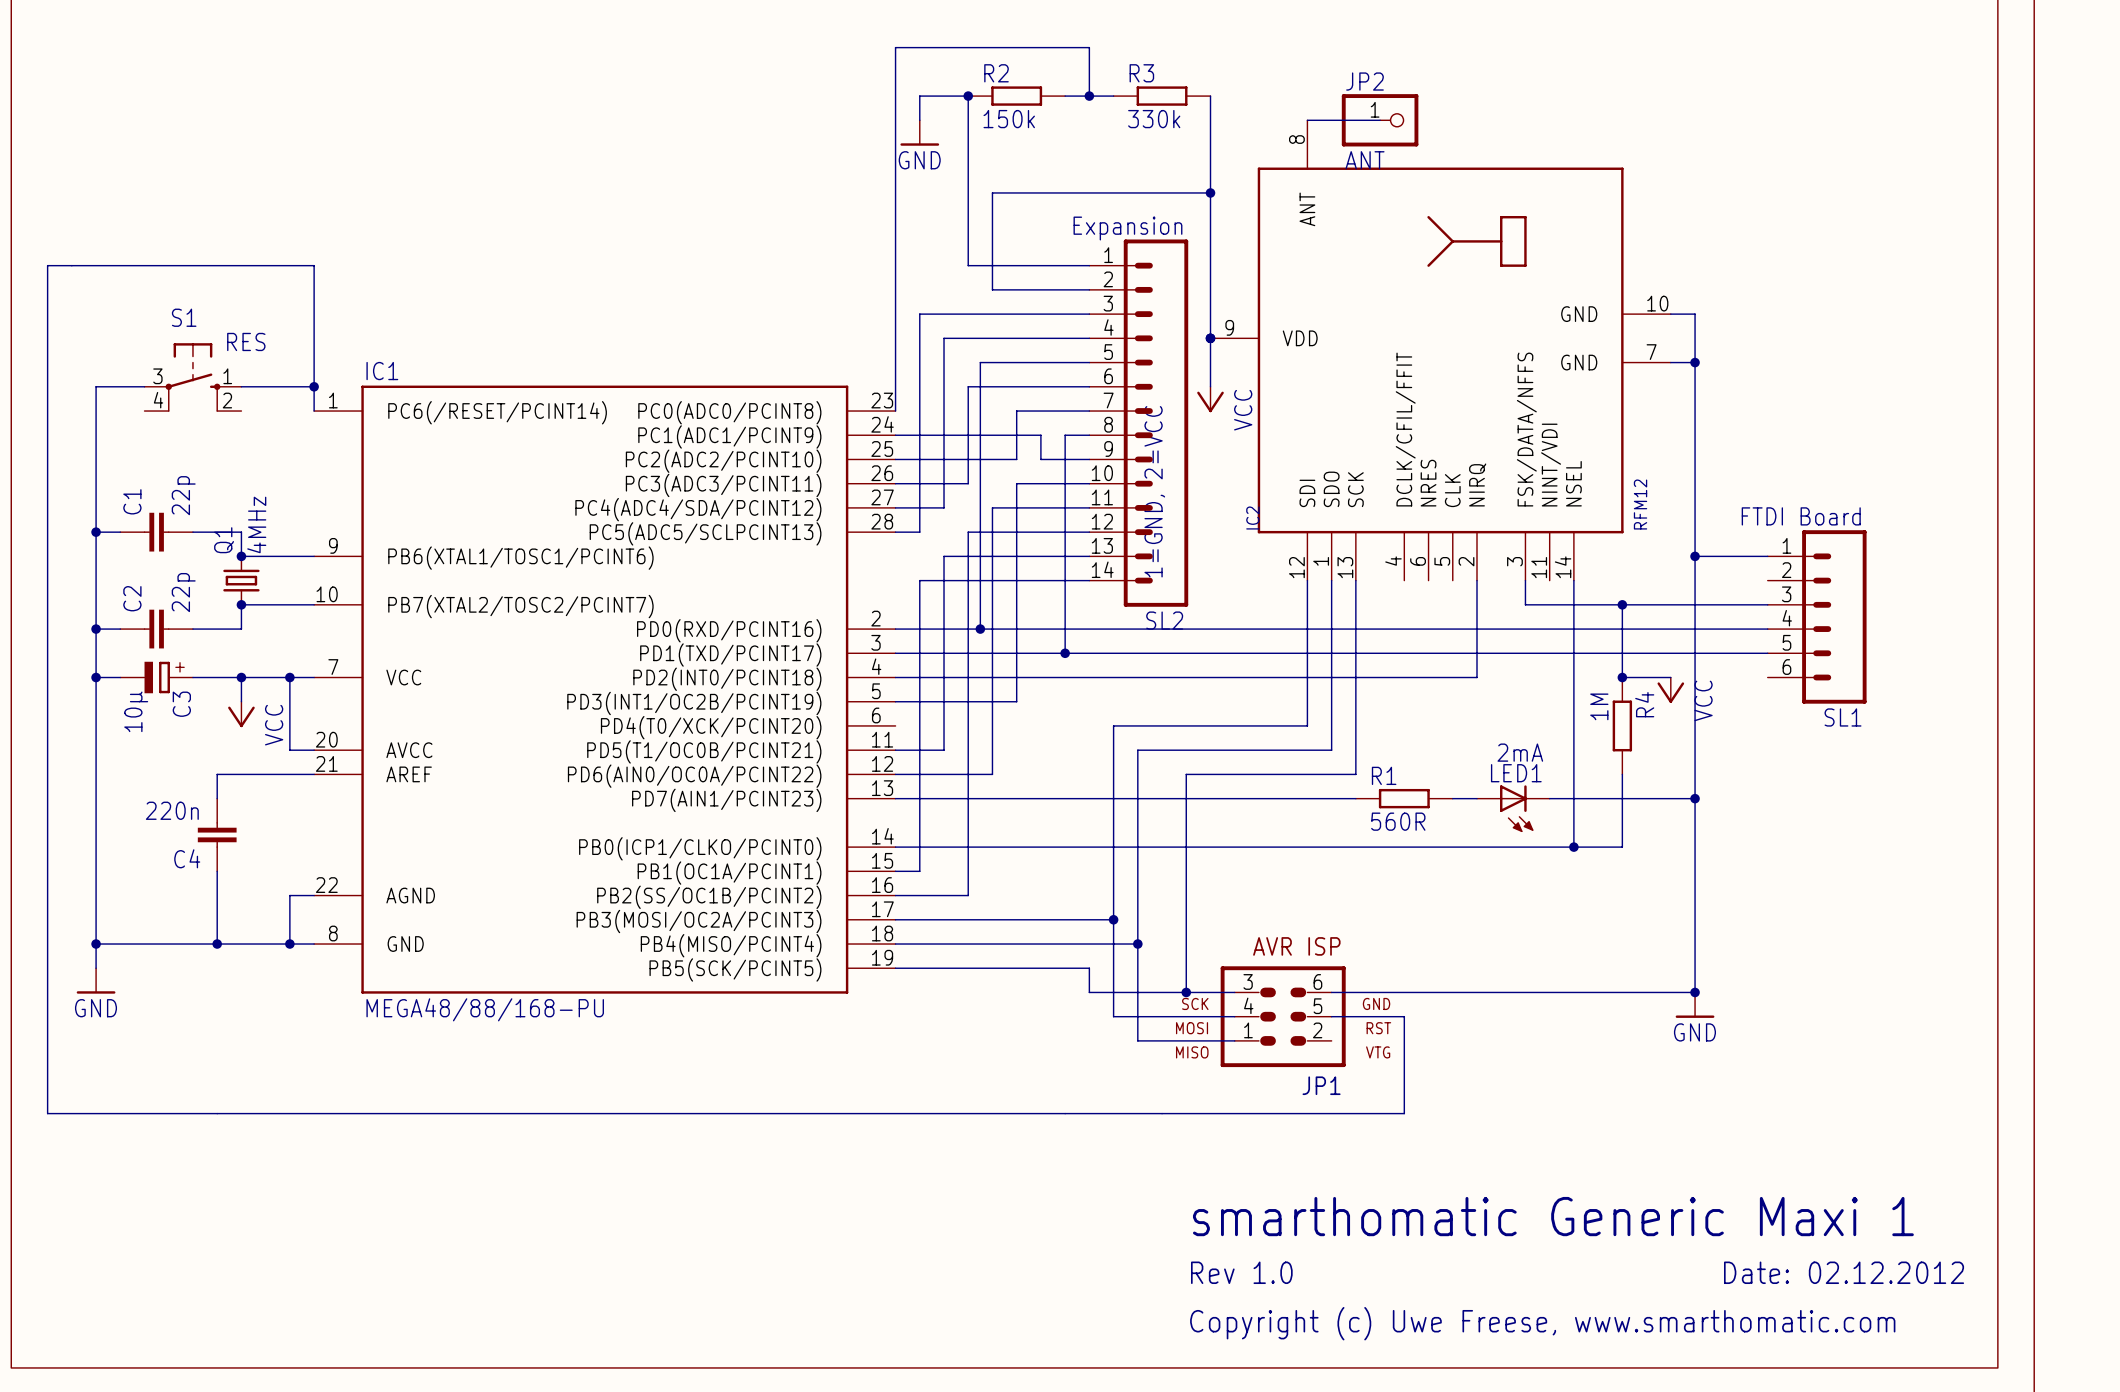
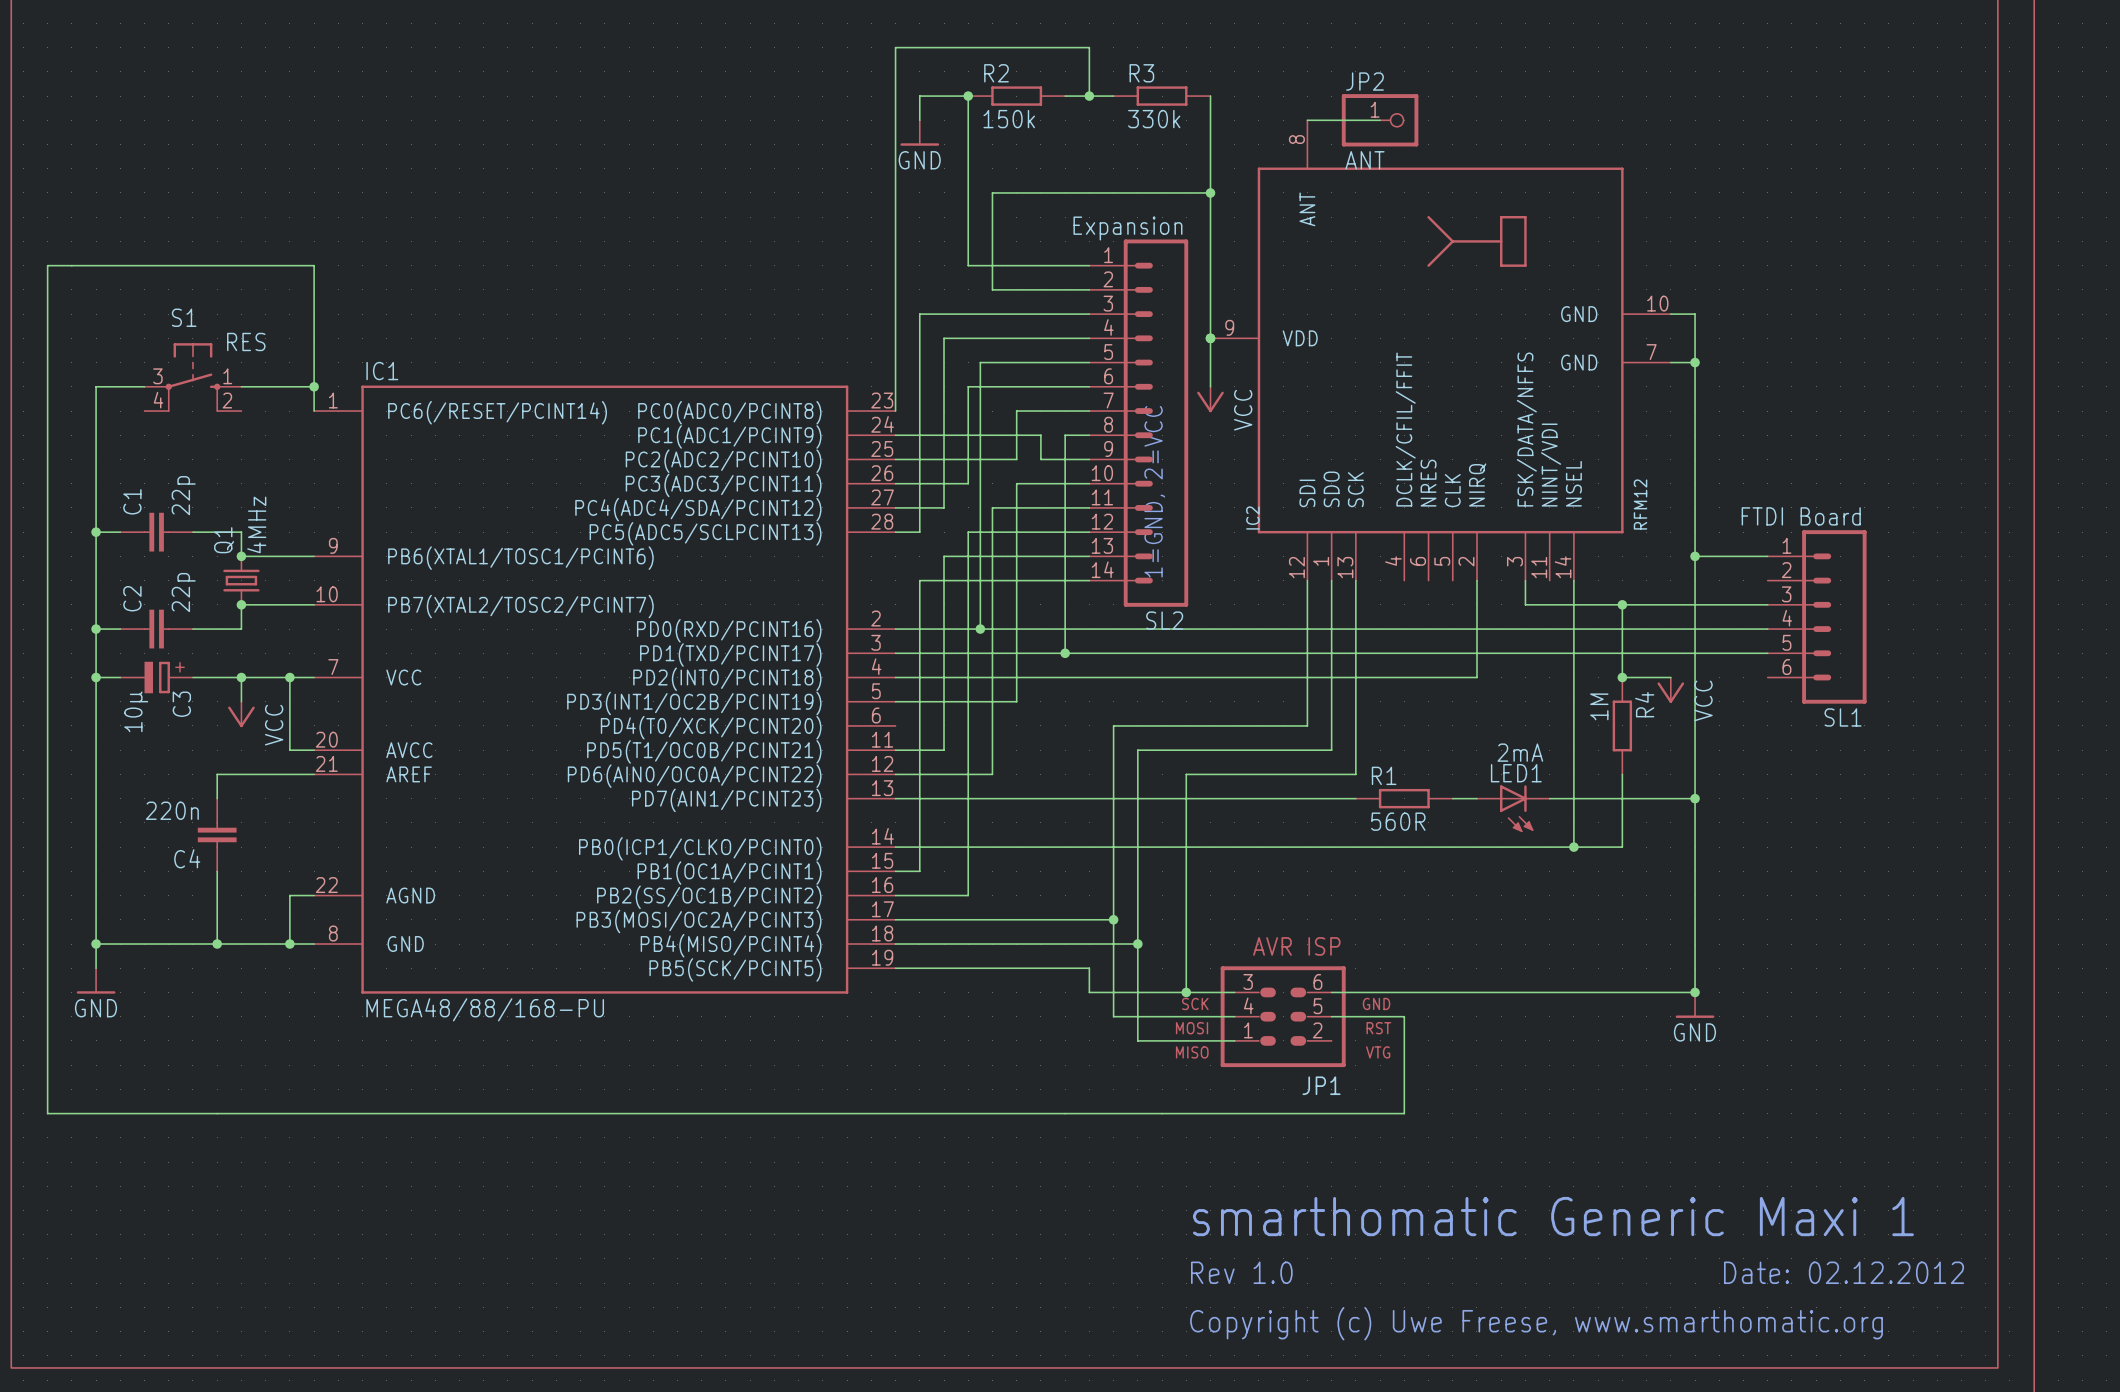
text: Copyright (c) Uwe Freese, www.smarthomatic.com (1542, 1323) -> Copyright (c) Uwe Freese, www.smarthomatic.org (1536, 1323)

